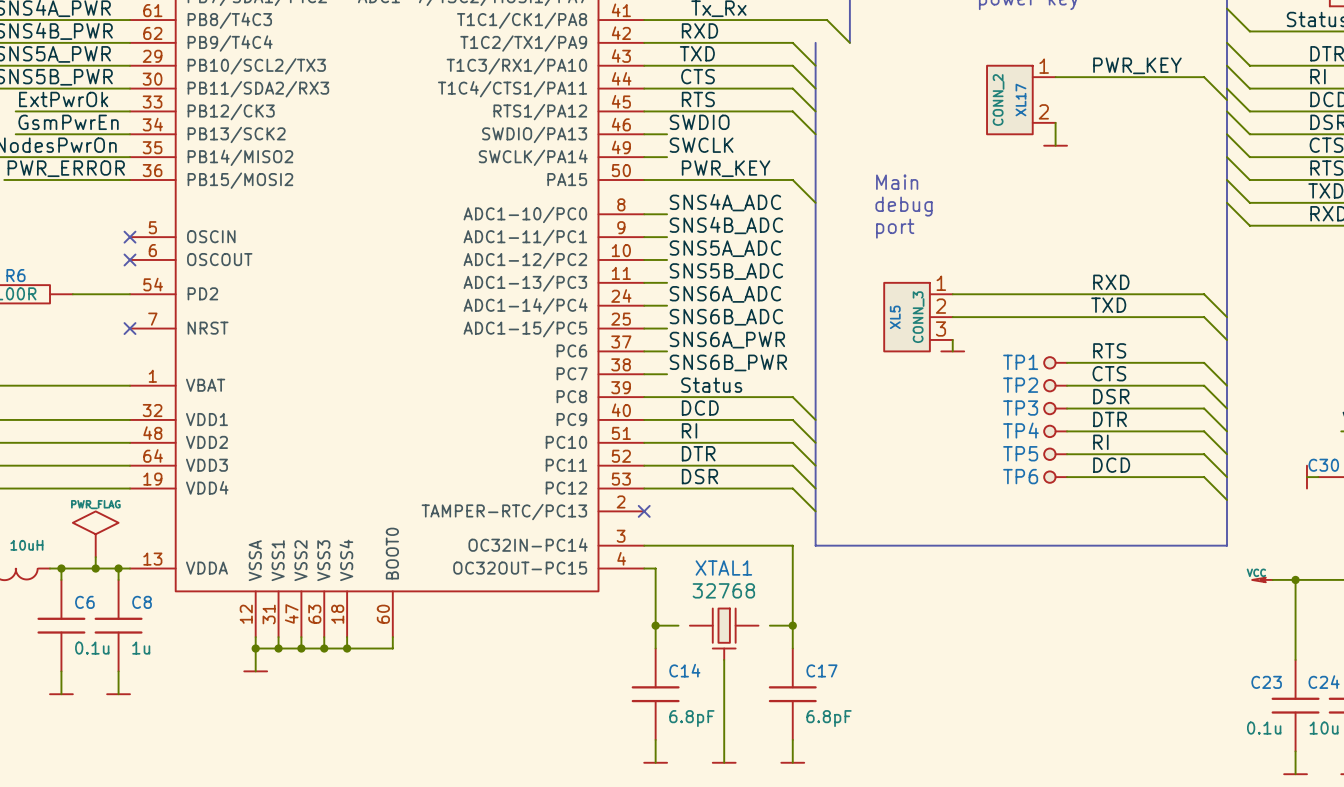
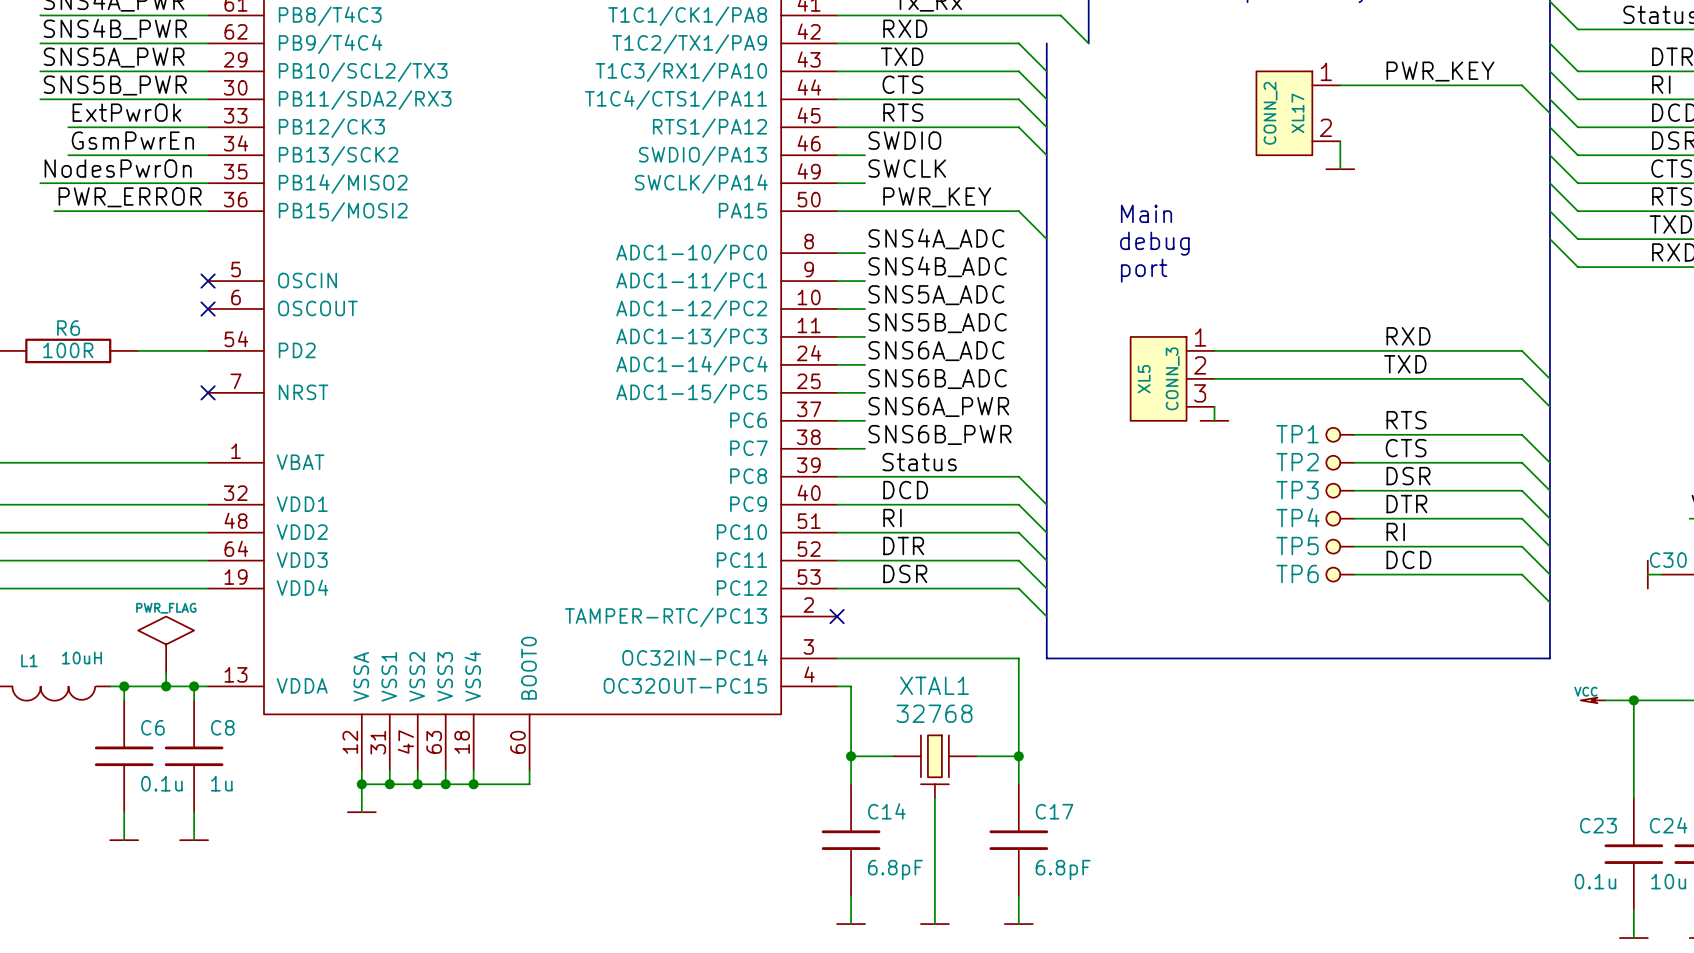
wire: none -> (879, 756) (893, 756)
wire: none -> (976, 756) (990, 756)

